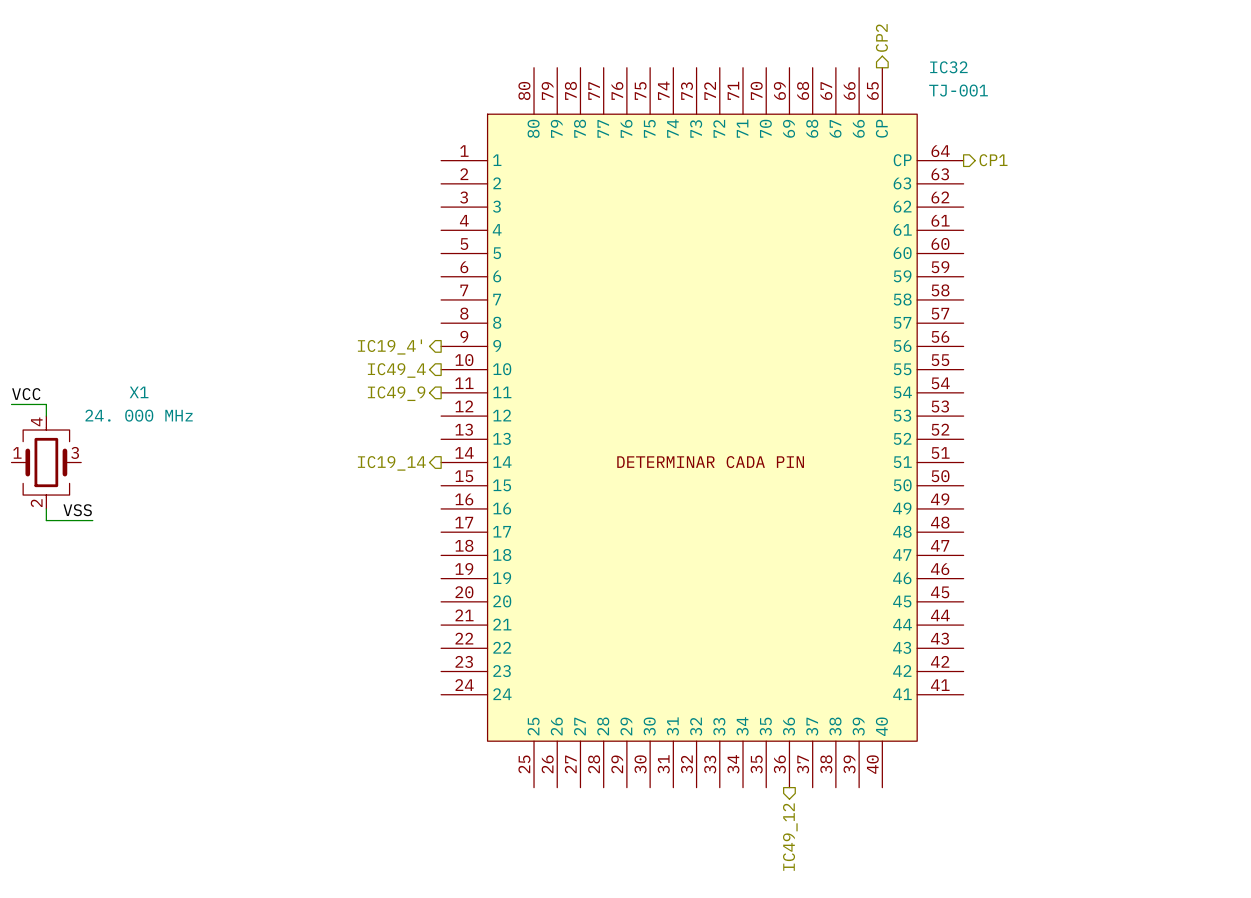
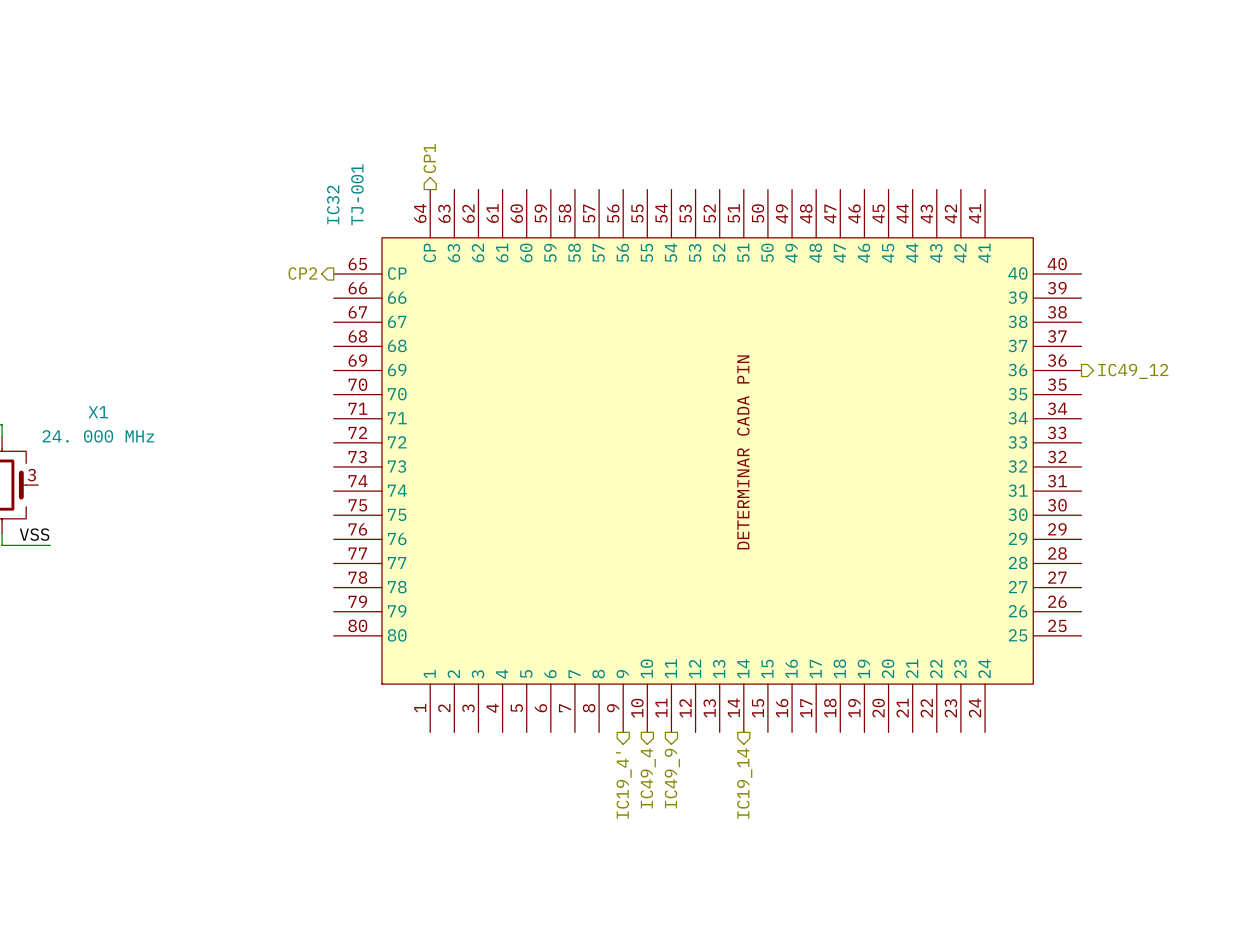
hierarchical label: CP2 (881, 37) -> none
hierarchical label: none -> CP1 (429, 158)
hierarchical label: CP1 (993, 160) -> none
hierarchical label: none -> CP2 (302, 273)
hierarchical label: IC19_4' (389, 347) -> none
hierarchical label: none -> IC49_12 (1133, 371)
hierarchical label: IC49_4 (396, 370) -> none
hierarchical label: IC49_9 (396, 393) -> none
IC32 rotation: 0° (702, 427) -> 90° counterclockwise (707, 460)
hierarchical label: IC19_14 (391, 463) -> none
hierarchical label: none -> IC49_4 (648, 778)
hierarchical label: none -> IC49_9 (672, 778)
hierarchical label: none -> IC19_14 (744, 783)
hierarchical label: none -> IC19_4' (623, 785)
hierarchical label: IC49_12 (790, 837) -> none

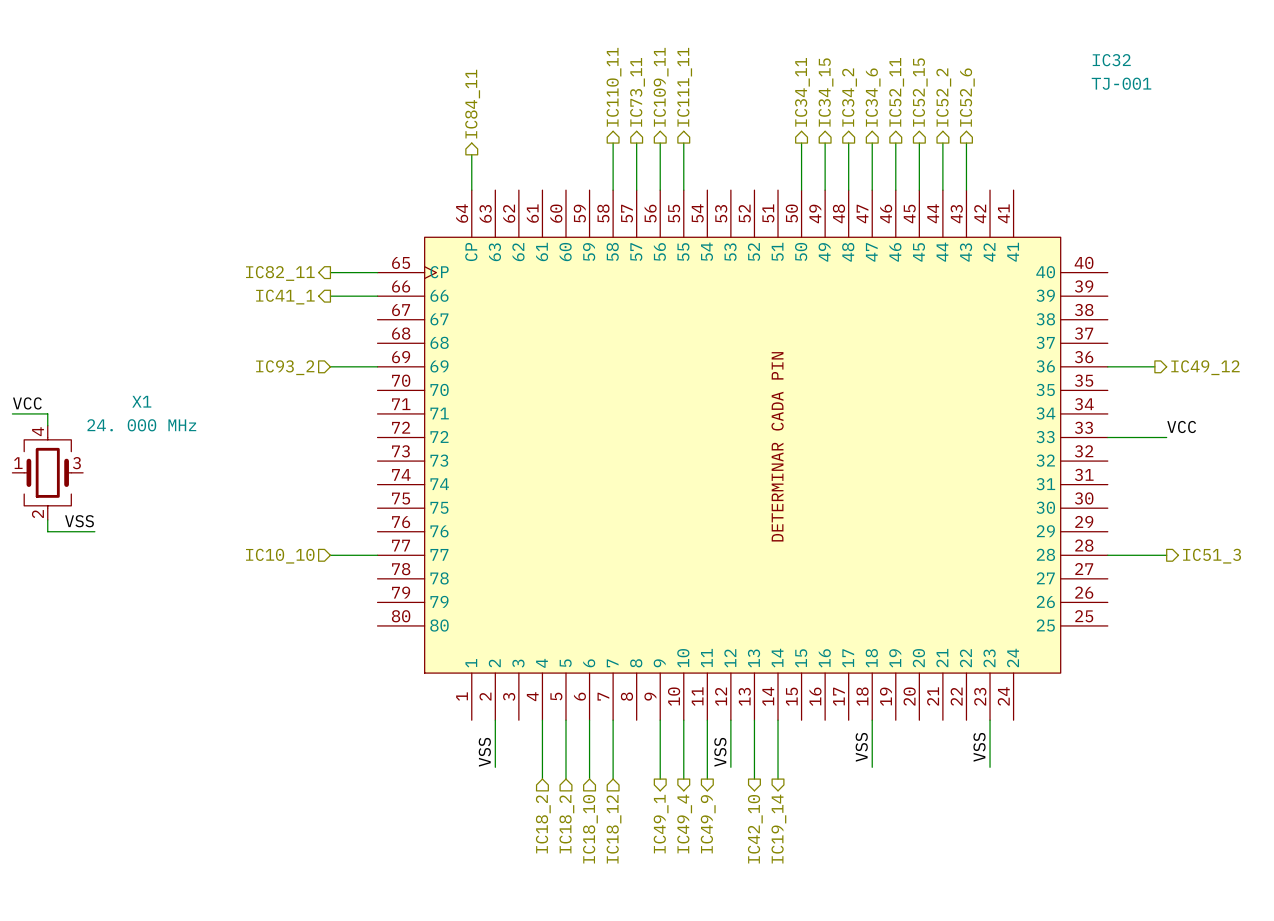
hierarchical label: none -> IC110_11 (613, 87)
hierarchical label: none -> IC109_11 (661, 87)
hierarchical label: none -> IC111_11 (684, 87)
hierarchical label: none -> IC73_11 (637, 92)
hierarchical label: none -> IC34_11 (802, 92)
hierarchical label: none -> IC34_15 (826, 92)
hierarchical label: none -> IC52_11 (896, 92)
hierarchical label: none -> IC52_15 (920, 92)
hierarchical label: none -> IC34_2 (849, 97)
hierarchical label: none -> IC34_6 (873, 97)
hierarchical label: none -> IC52_2 (943, 97)
hierarchical label: none -> IC52_6 (967, 97)
hierarchical label: none -> IC84_11 (472, 104)
wire: none -> (613, 143) (613, 190)
wire: none -> (636, 143) (636, 190)
wire: none -> (660, 143) (660, 190)
wire: none -> (683, 143) (683, 190)
wire: none -> (801, 143) (801, 190)
wire: none -> (825, 143) (825, 190)
wire: none -> (848, 143) (848, 190)
wire: none -> (872, 143) (872, 190)
wire: none -> (895, 143) (895, 190)
wire: none -> (919, 143) (919, 190)
wire: none -> (942, 143) (942, 190)
wire: none -> (966, 143) (966, 190)
hierarchical label: CP1 (429, 158) -> none
wire: none -> (471, 154) (471, 190)
IC32 symbol: [333, 189, 1082, 733] -> [377, 190, 1108, 721]
IC32 value position: TJ-001 (357, 194) -> TJ-001 (1121, 83)
IC32 name position: IC32 (333, 204) -> IC32 (1111, 60)
hierarchical label: CP2 (302, 273) -> none
hierarchical label: none -> IC82_11 (280, 273)
wire: none -> (330, 272) (377, 272)
wire: none -> (330, 296) (377, 296)
hierarchical label: none -> IC41_1 (285, 297)
hierarchical label position: IC49_12 (1133, 371) -> IC49_12 (1205, 367)
wire: none -> (330, 366) (377, 366)
wire: none -> (1107, 366) (1154, 366)
hierarchical label: none -> IC93_2 (285, 367)
label: none -> VCC (1181, 426)
wire: none -> (1107, 437) (1166, 437)
wire: none -> (330, 555) (377, 555)
wire: none -> (1107, 555) (1166, 555)
hierarchical label: none -> IC10_10 (280, 556)
hierarchical label: none -> IC51_3 (1212, 556)
wire: none -> (495, 720) (495, 767)
wire: none -> (542, 720) (542, 779)
wire: none -> (565, 720) (565, 779)
wire: none -> (589, 720) (589, 779)
wire: none -> (613, 720) (613, 779)
wire: none -> (660, 720) (660, 779)
wire: none -> (683, 720) (683, 779)
wire: none -> (707, 720) (707, 779)
wire: none -> (730, 720) (730, 767)
wire: none -> (754, 720) (754, 779)
wire: none -> (778, 720) (778, 779)
wire: none -> (872, 720) (872, 767)
wire: none -> (990, 720) (990, 767)
label: none -> VSS (861, 747)
label: none -> VSS (979, 747)
label: none -> VSS (484, 752)
label: none -> VSS (720, 752)
hierarchical label position: IC49_4 (648, 778) -> IC49_4 (684, 824)
hierarchical label position: IC49_9 (672, 778) -> IC49_9 (708, 824)
hierarchical label position: IC19_14 (744, 783) -> IC19_14 (778, 829)
hierarchical label: IC19_4' (623, 785) -> IC49_1 (661, 824)
hierarchical label: none -> IC18_2 (543, 824)
hierarchical label: none -> IC18_2 (566, 824)
hierarchical label: none -> IC18_10 (590, 829)
hierarchical label: none -> IC18_12 (613, 829)
hierarchical label: none -> IC42_10 (755, 829)

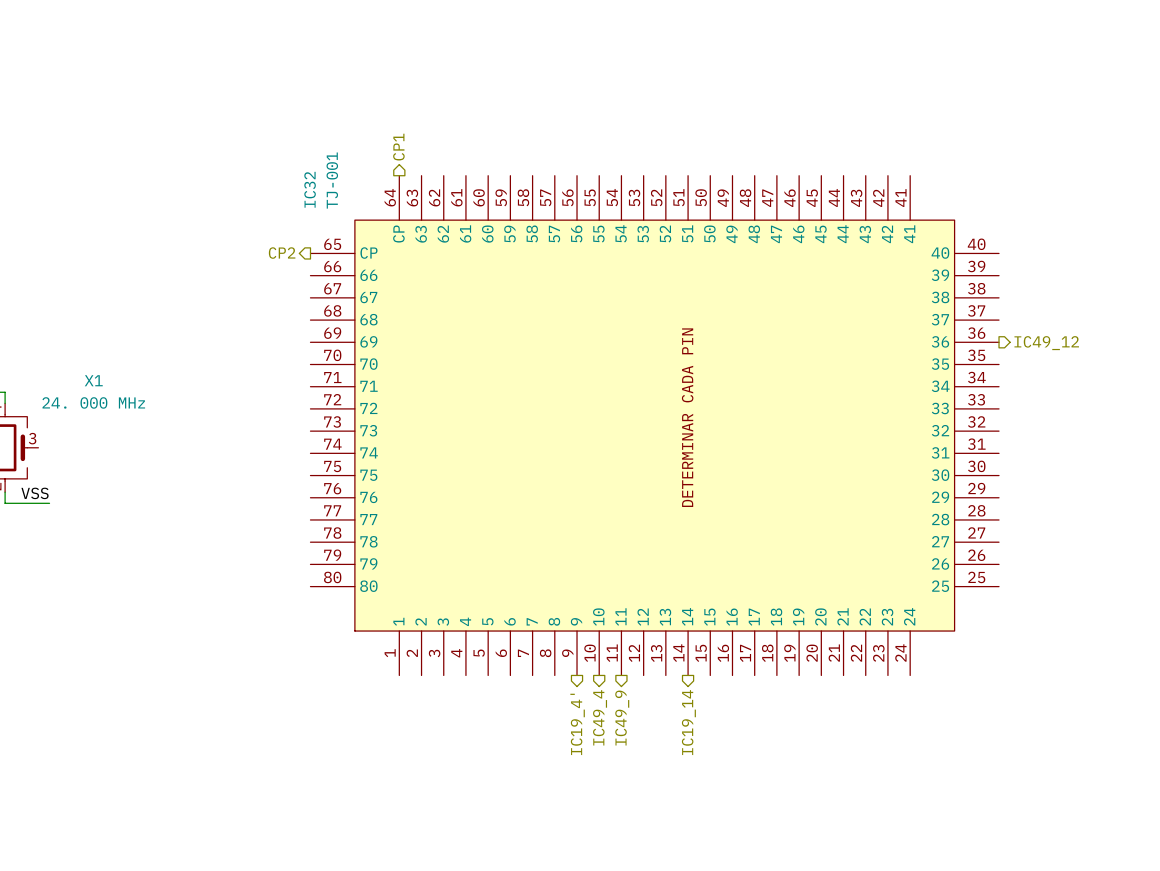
IC32 name position: IC32 (1111, 60) -> IC32 (310, 189)
IC32 value position: TJ-001 (1121, 83) -> TJ-001 (332, 180)
hierarchical label: IC110_11 (613, 87) -> none
hierarchical label: IC109_11 (661, 87) -> none
hierarchical label: IC111_11 (684, 87) -> none
hierarchical label: IC73_11 (637, 92) -> none
hierarchical label: IC34_11 (802, 92) -> none
hierarchical label: IC34_15 (826, 92) -> none
hierarchical label: IC52_11 (896, 92) -> none
hierarchical label: IC52_15 (920, 92) -> none
hierarchical label: IC34_2 (849, 97) -> none
hierarchical label: IC34_6 (873, 97) -> none
hierarchical label: IC52_2 (943, 97) -> none
hierarchical label: IC52_6 (967, 97) -> none
hierarchical label: IC84_11 (472, 104) -> none
wire: (613, 143) (613, 190) -> none
wire: (636, 143) (636, 190) -> none
wire: (660, 143) (660, 190) -> none
wire: (683, 143) (683, 190) -> none
wire: (801, 143) (801, 190) -> none
wire: (825, 143) (825, 190) -> none
wire: (848, 143) (848, 190) -> none
wire: (872, 143) (872, 190) -> none
wire: (895, 143) (895, 190) -> none
wire: (919, 143) (919, 190) -> none
wire: (942, 143) (942, 190) -> none
wire: (966, 143) (966, 190) -> none
hierarchical label: none -> CP1 (398, 147)
wire: (471, 154) (471, 190) -> none
IC32 symbol: [377, 190, 1108, 721] -> [310, 175, 1000, 676]
hierarchical label: none -> CP2 (282, 253)
wire: (330, 272) (377, 272) -> none
hierarchical label: IC82_11 (280, 273) -> none
wire: (330, 296) (377, 296) -> none
hierarchical label: IC41_1 (285, 297) -> none
wire: (330, 366) (377, 366) -> none
wire: (1107, 366) (1154, 366) -> none
hierarchical label: IC93_2 (285, 367) -> none
hierarchical label position: IC49_12 (1205, 367) -> IC49_12 (1046, 343)
label: VCC (1181, 426) -> none
wire: (1107, 437) (1166, 437) -> none
wire: (330, 555) (377, 555) -> none
wire: (1107, 555) (1166, 555) -> none
hierarchical label: IC10_10 (280, 556) -> none
hierarchical label: IC51_3 (1212, 556) -> none
wire: (495, 720) (495, 767) -> none
wire: (542, 720) (542, 779) -> none
wire: (565, 720) (565, 779) -> none
wire: (589, 720) (589, 779) -> none
wire: (613, 720) (613, 779) -> none
wire: (660, 720) (660, 779) -> none
wire: (683, 720) (683, 779) -> none
wire: (707, 720) (707, 779) -> none
wire: (730, 720) (730, 767) -> none
wire: (754, 720) (754, 779) -> none
wire: (778, 720) (778, 779) -> none
wire: (872, 720) (872, 767) -> none
wire: (990, 720) (990, 767) -> none
label: VSS (861, 747) -> none
label: VSS (979, 747) -> none
label: VSS (484, 752) -> none
label: VSS (720, 752) -> none
hierarchical label: IC18_2 (543, 824) -> none
hierarchical label: IC18_2 (566, 824) -> none
hierarchical label: IC49_1 (661, 824) -> IC19_4' (577, 724)
hierarchical label position: IC49_4 (684, 824) -> IC49_4 (600, 717)
hierarchical label position: IC49_9 (708, 824) -> IC49_9 (622, 718)
hierarchical label: IC18_10 (590, 829) -> none
hierarchical label: IC18_12 (613, 829) -> none
hierarchical label: IC42_10 (755, 829) -> none
hierarchical label position: IC19_14 (778, 829) -> IC19_14 (688, 722)

